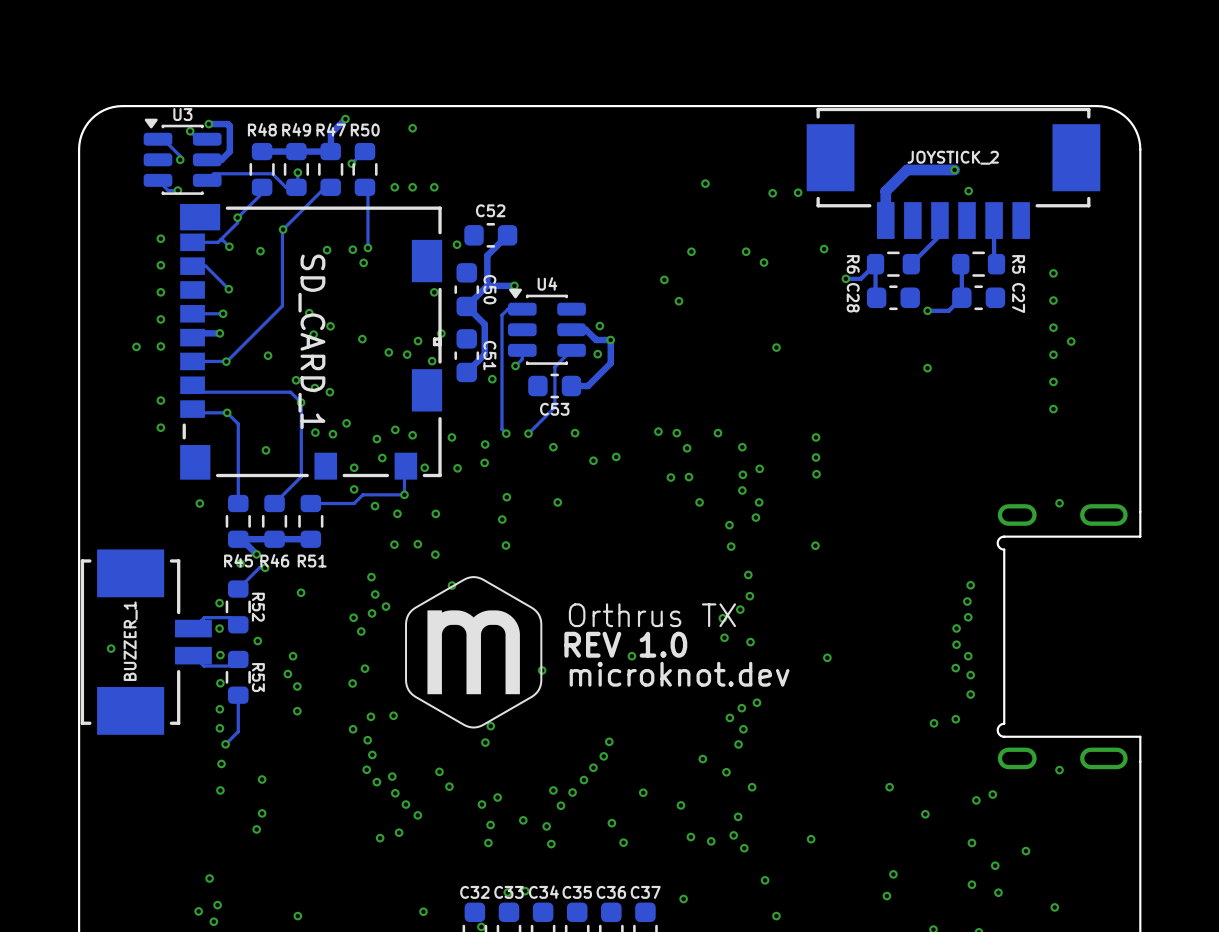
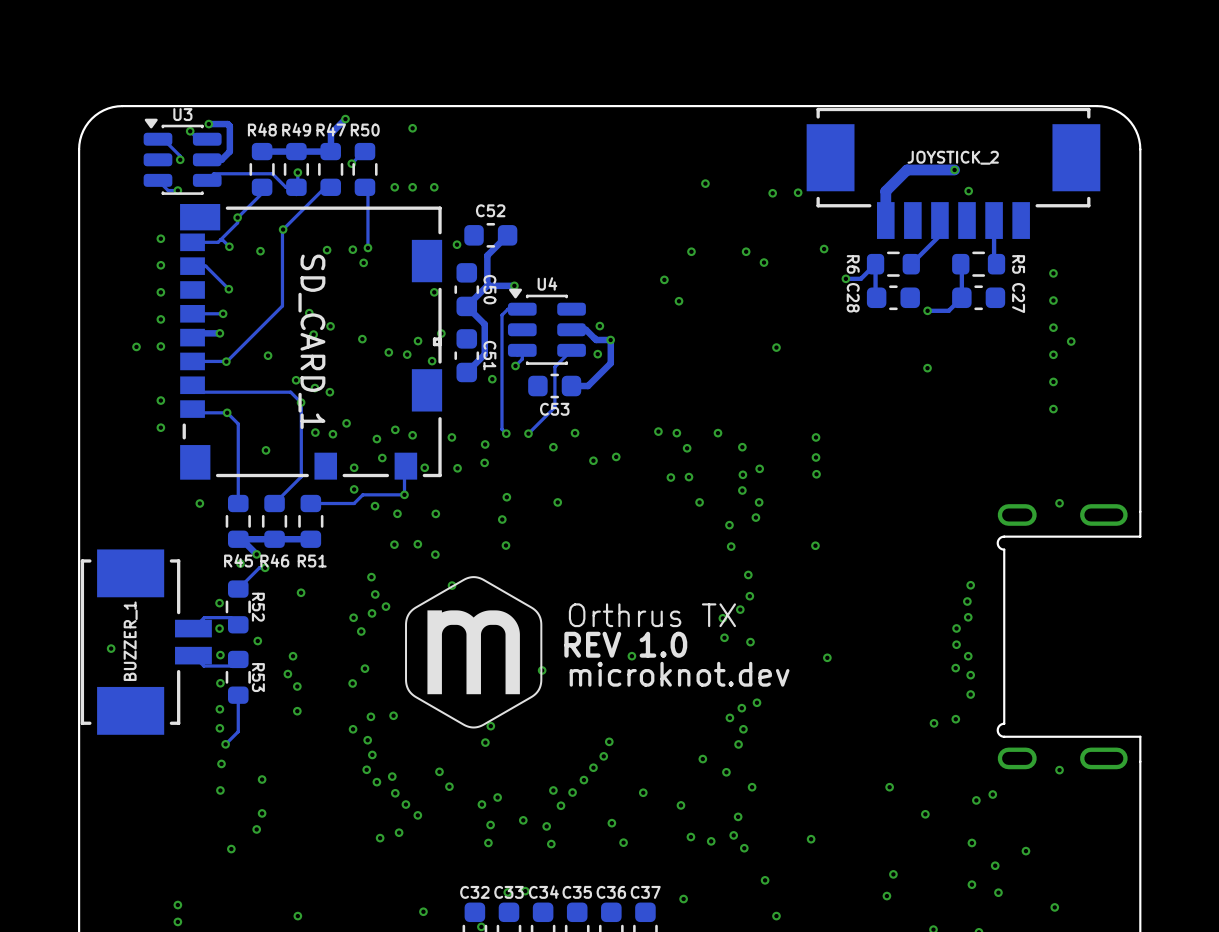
via: none -> (231, 849)
via: (209, 878) -> none
via: none -> (177, 905)
via: (217, 905) -> none
via: (198, 911) -> none
via: none -> (177, 921)
via: (213, 921) -> none

